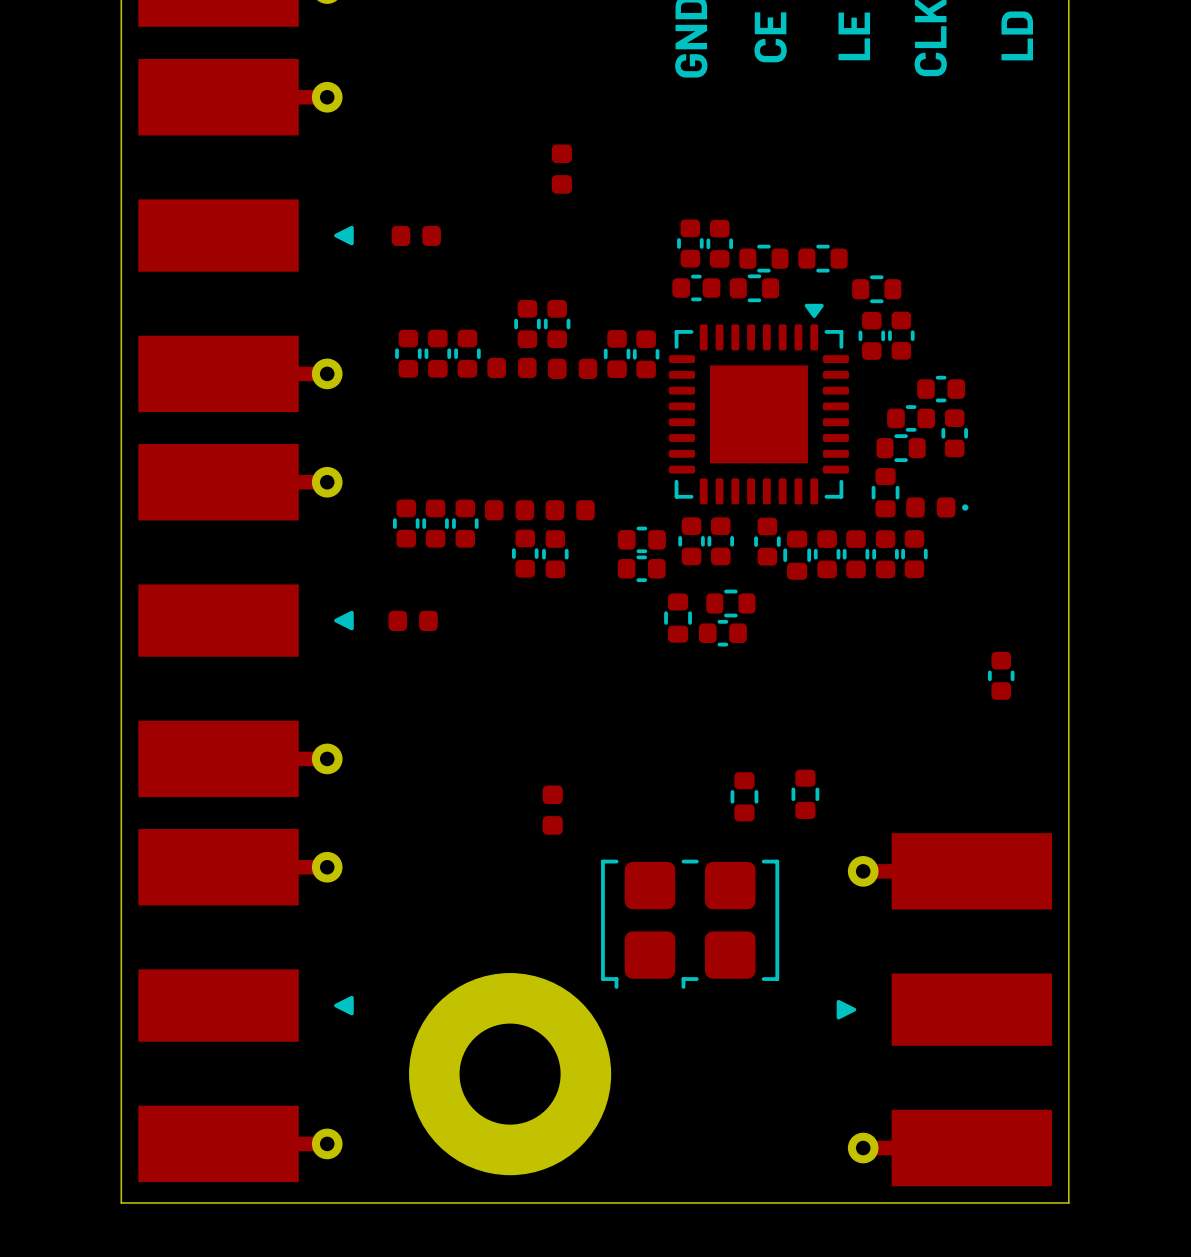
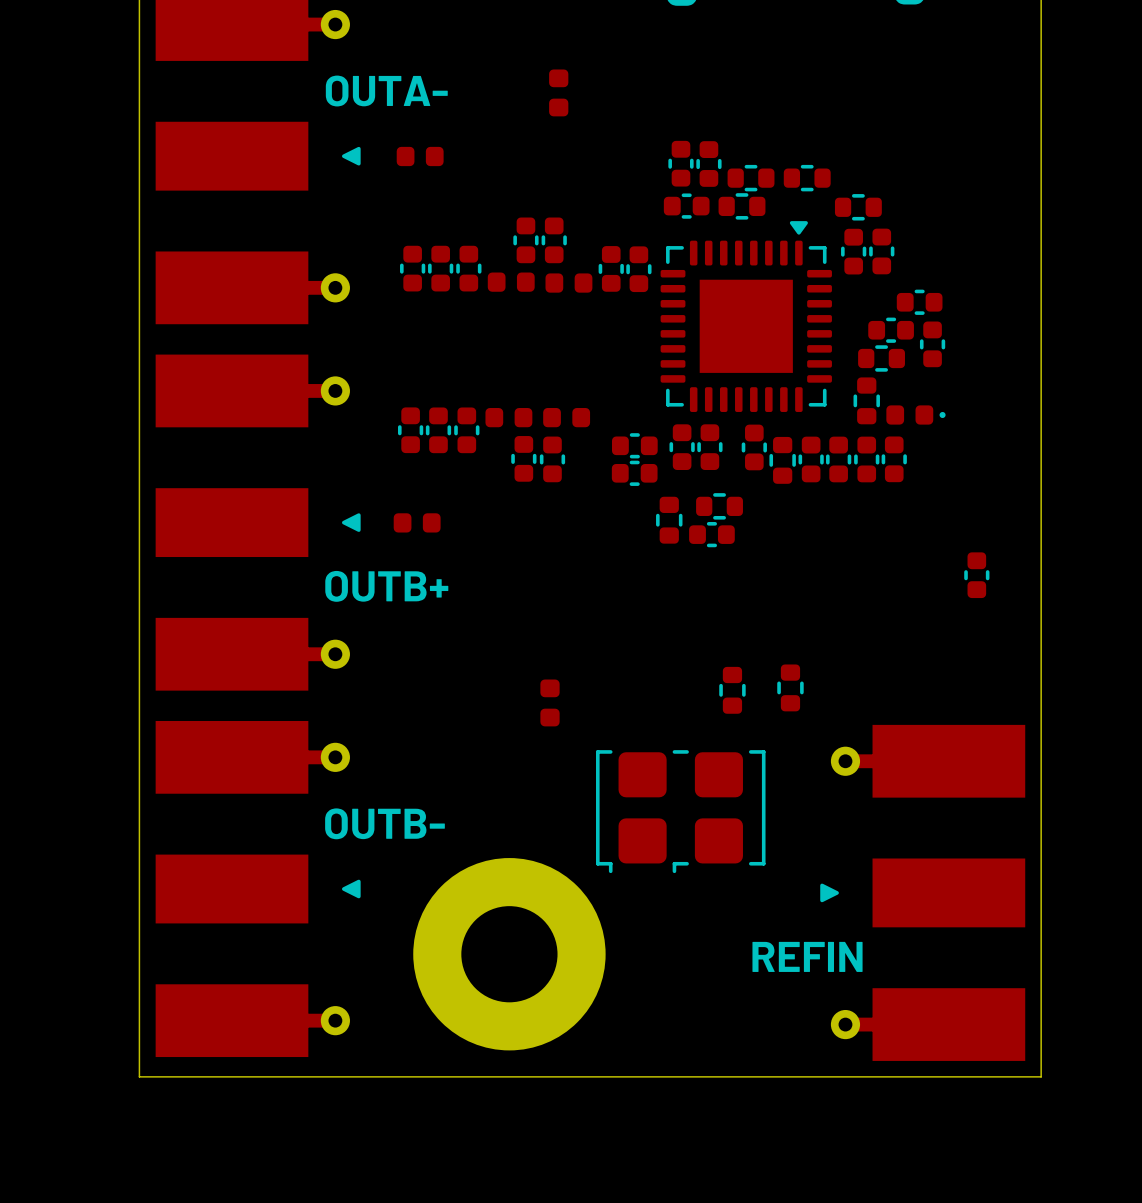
text: none -> OUTA- (386, 91)
text: none -> OUTB+ (386, 586)
text: none -> OUTB- (384, 823)
text: none -> REFIN (807, 956)

